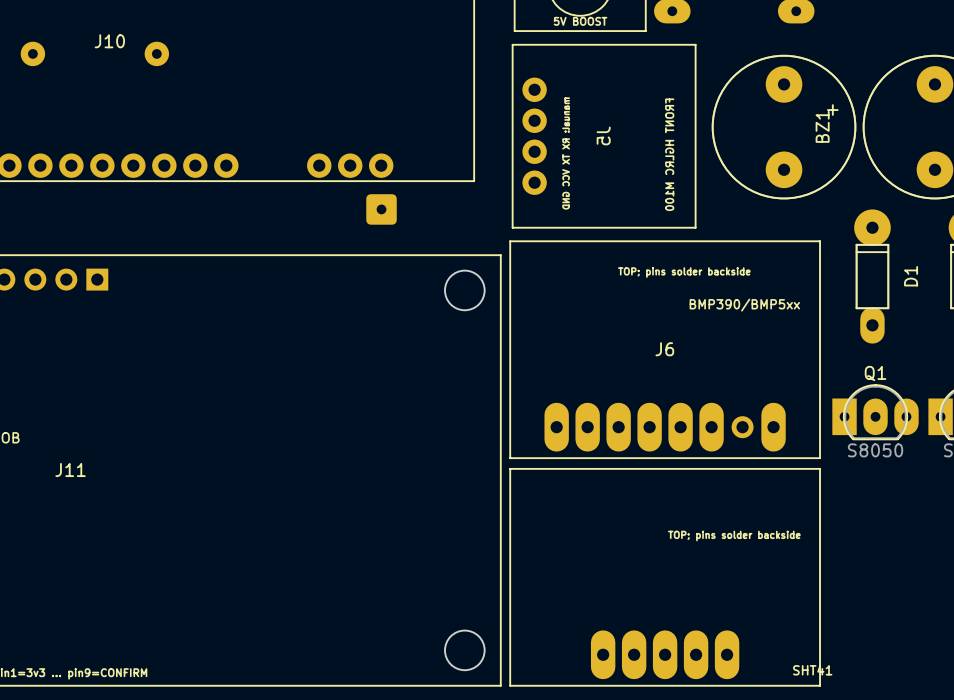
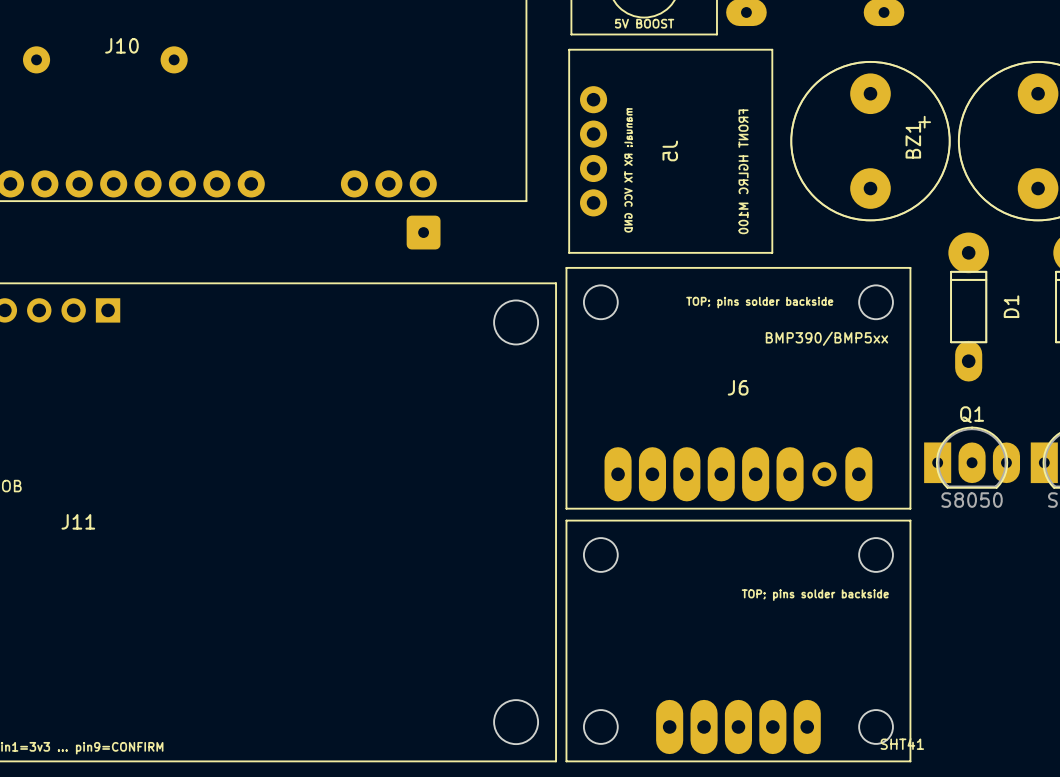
J6 footprint: [509, 240, 821, 459] -> [565, 267, 912, 510]
part footprint: [509, 468, 821, 687] -> [565, 519, 912, 763]

